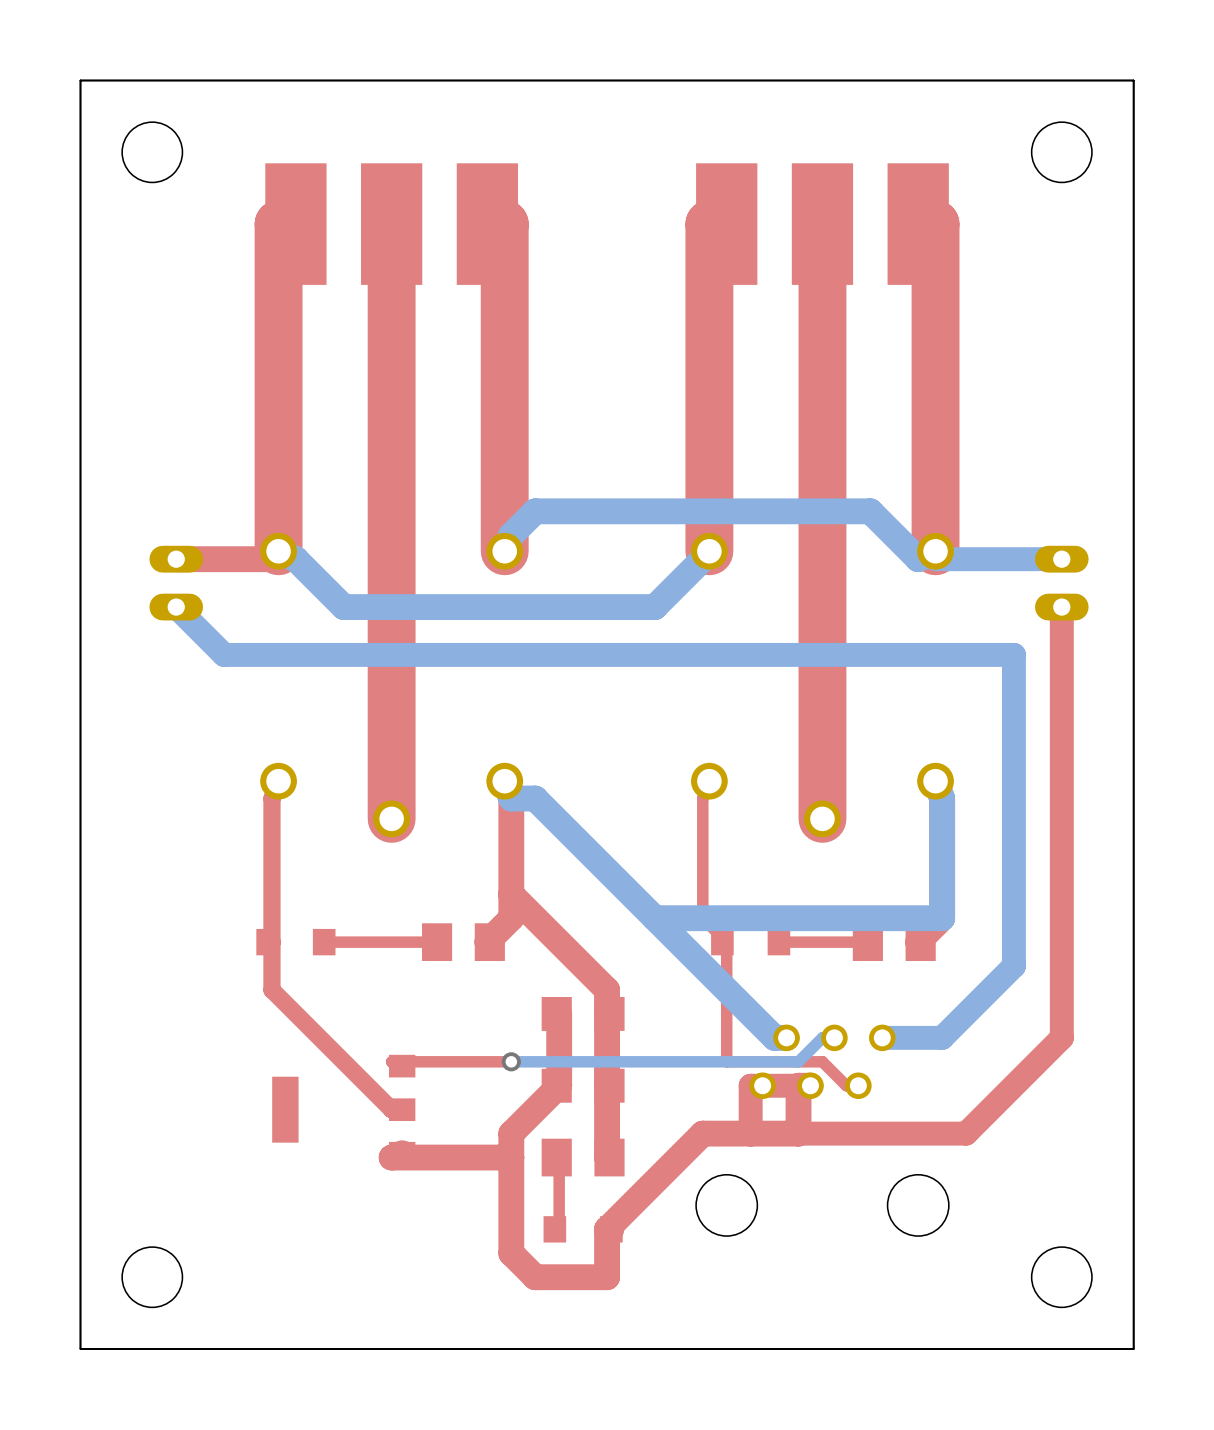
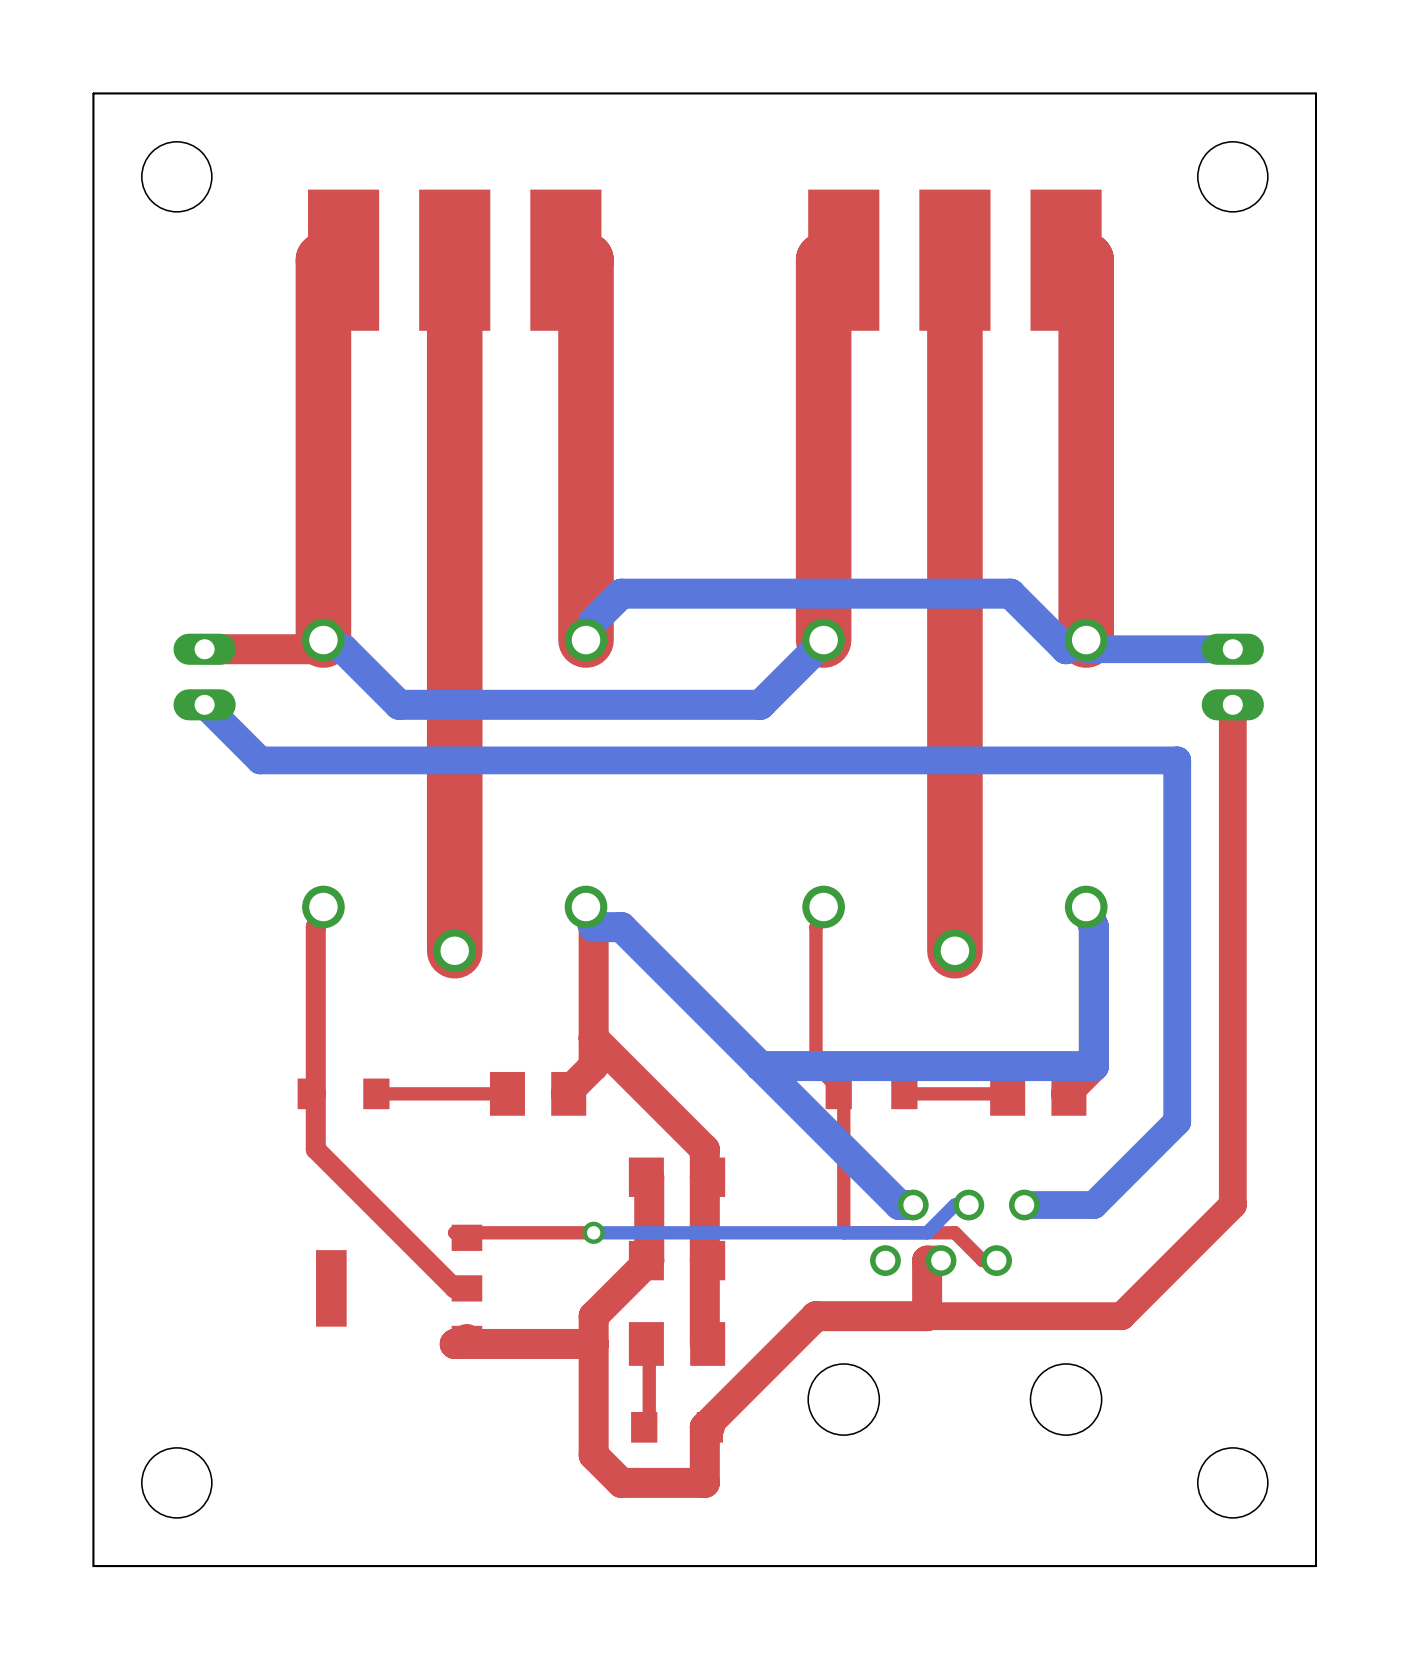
top track: (798, 1085) (750, 1085) (750, 1133) -> none

